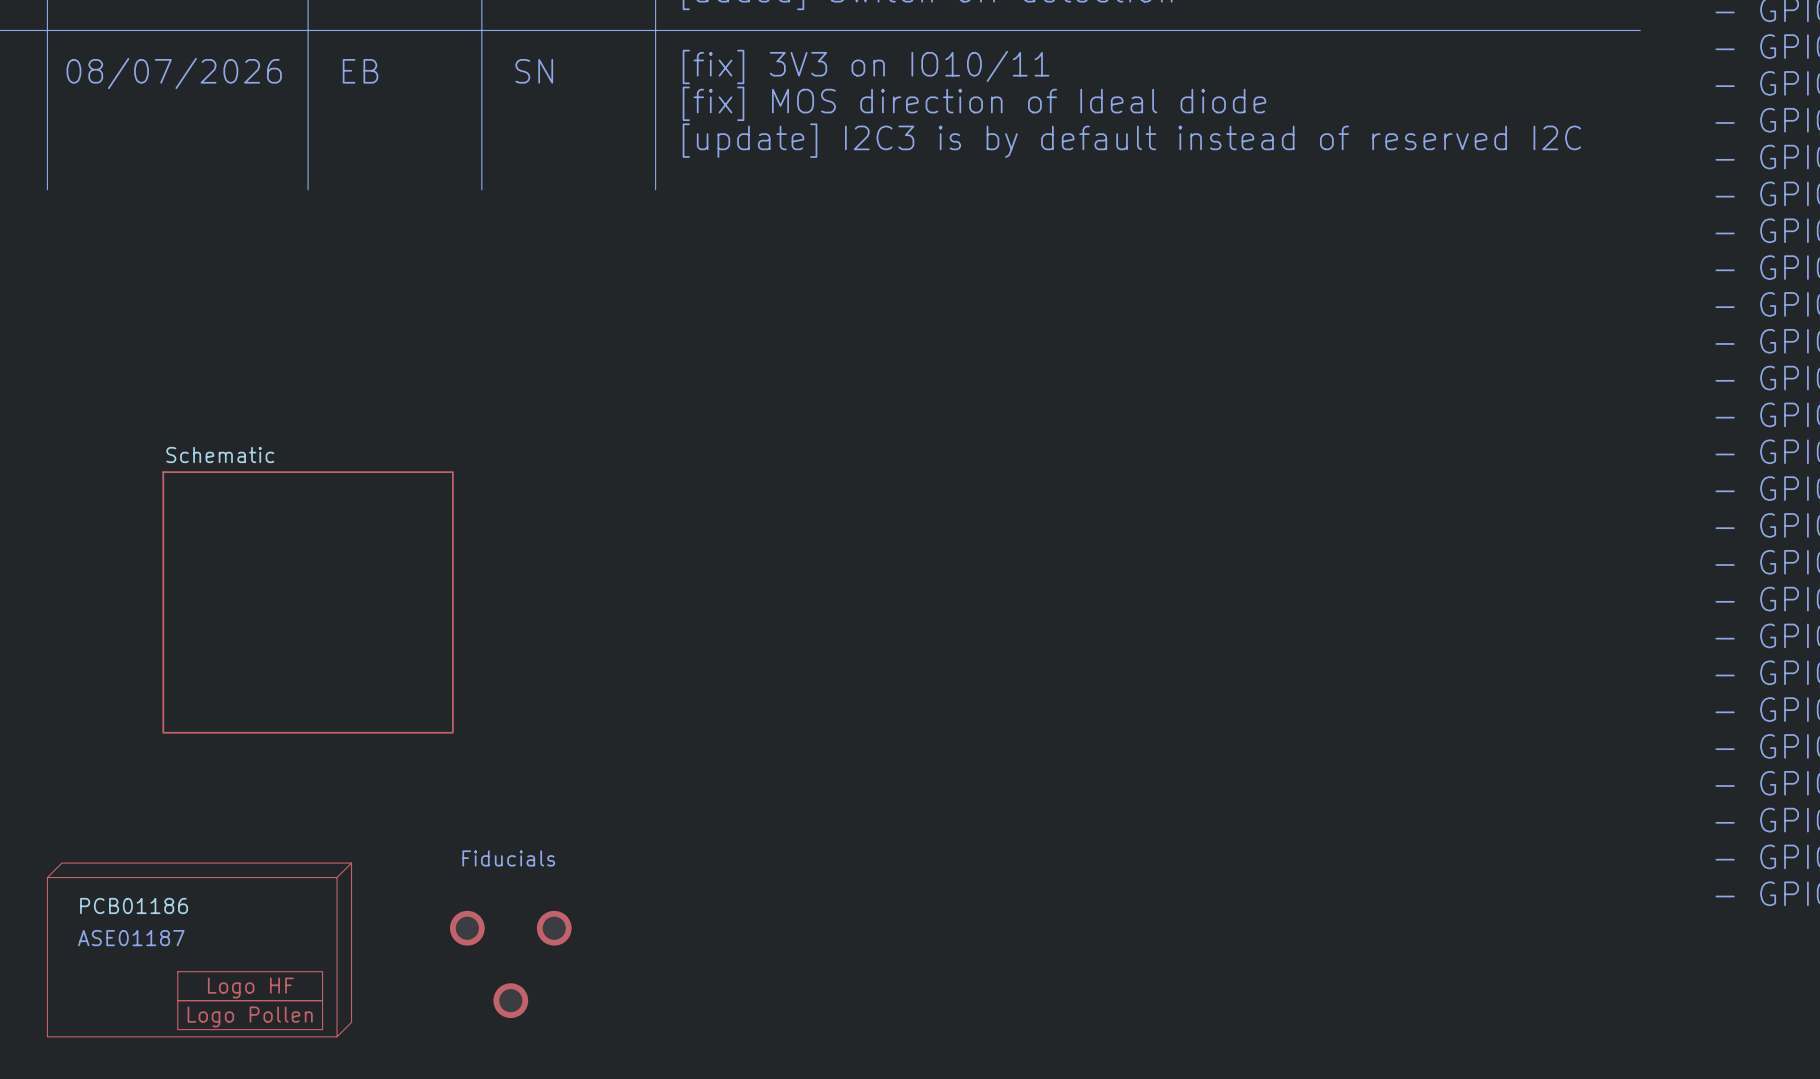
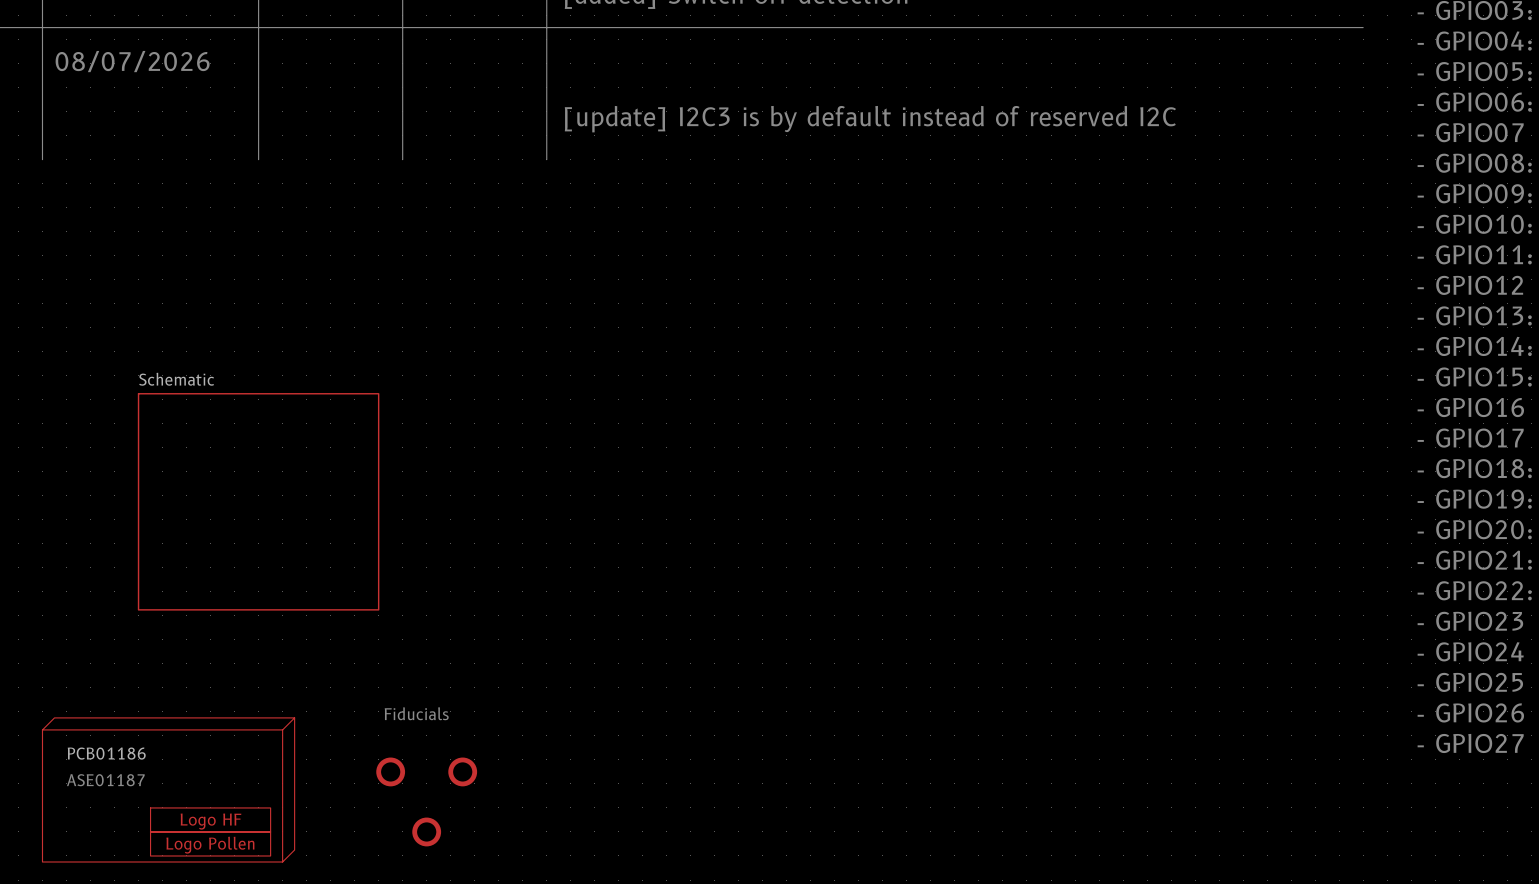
text: [fix] 3V3 on IO10/11 (866, 66) -> none
text: EB (360, 71) -> none
text: SN (534, 71) -> none
text: [fix] MOS direction of Ideal diode (974, 103) -> none

